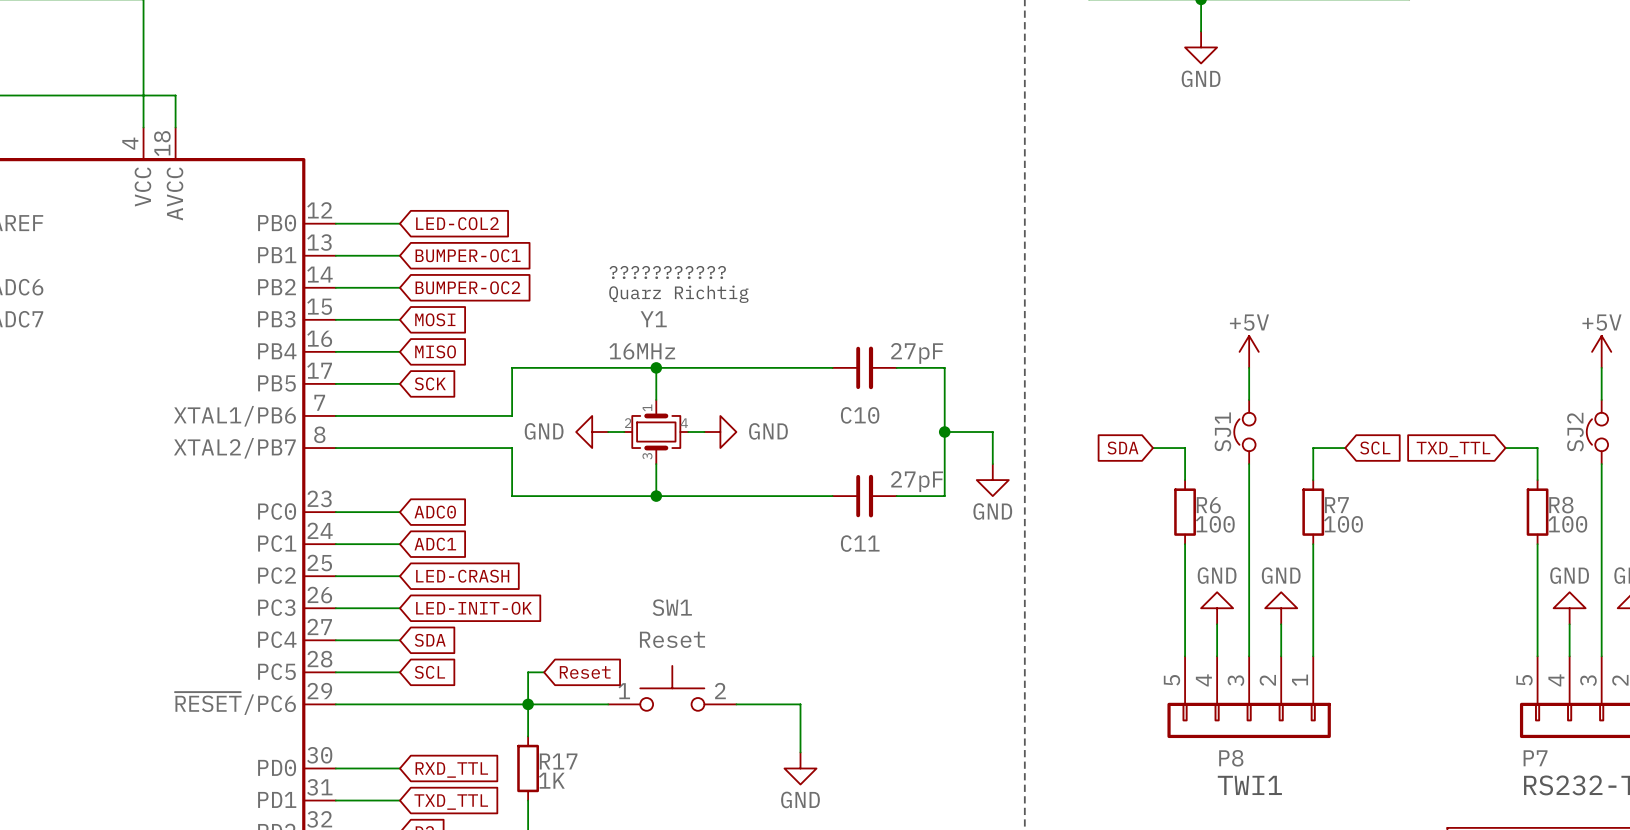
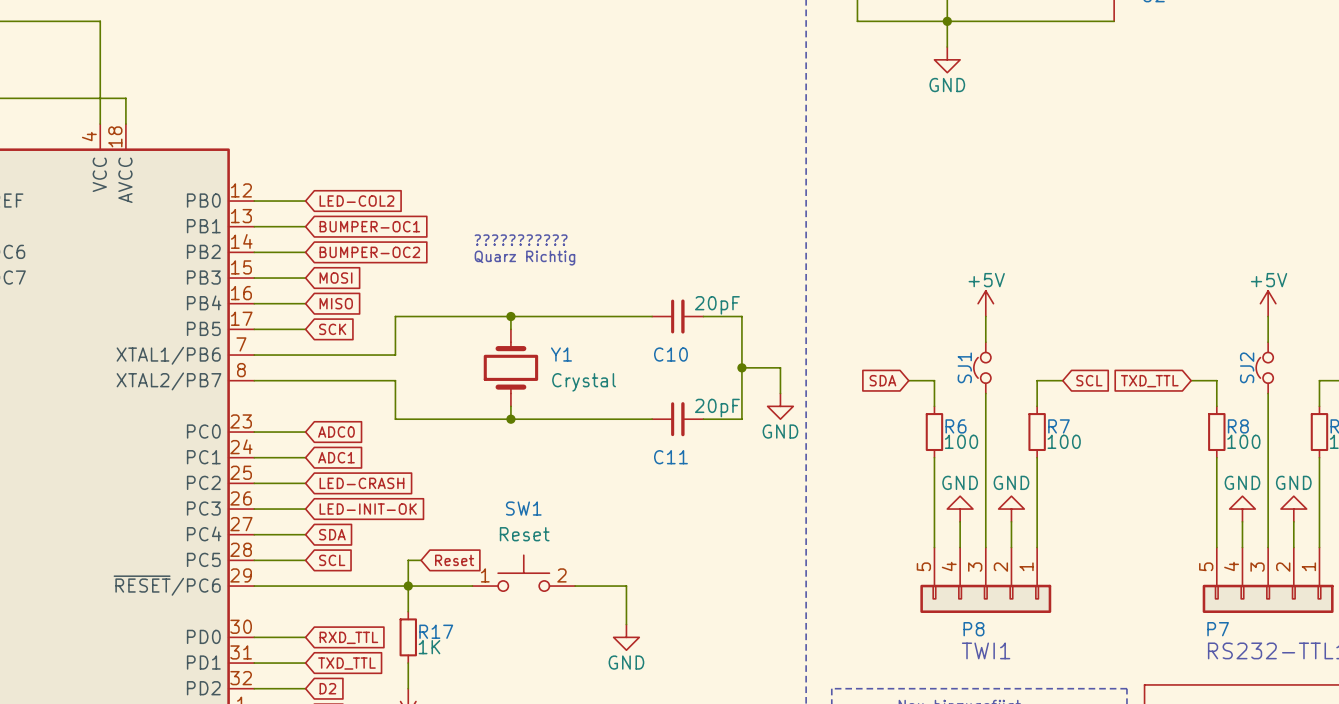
Y1 name position: Y1 (653, 319) -> Y1 (561, 354)
Y1 value: 16MHz (642, 351) -> Crystal (584, 382)
C10 value: 27pF (917, 353) -> 20pF (717, 305)
Y1 symbol: [624, 399, 689, 465] -> [483, 329, 539, 407]
power symbol: GND (592, 432) -> none
wire: (608, 432) (624, 432) -> none
wire: (688, 432) (704, 432) -> none
power symbol: GND (720, 432) -> none
C11 value: 27pF (917, 481) -> 20pF (717, 408)

